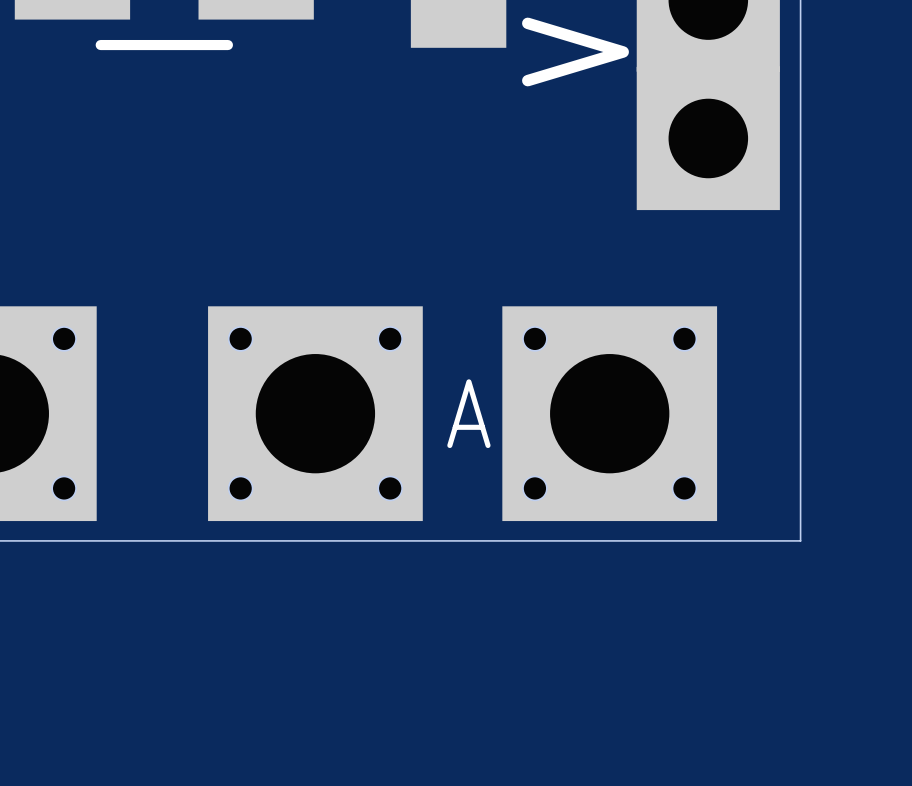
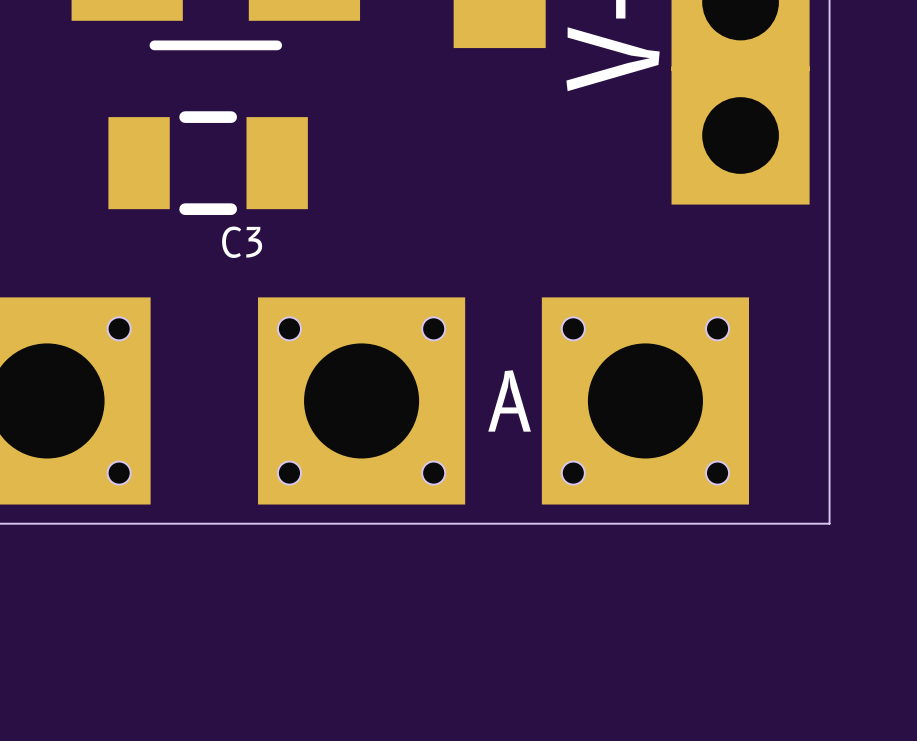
C3: none -> (208, 163)

